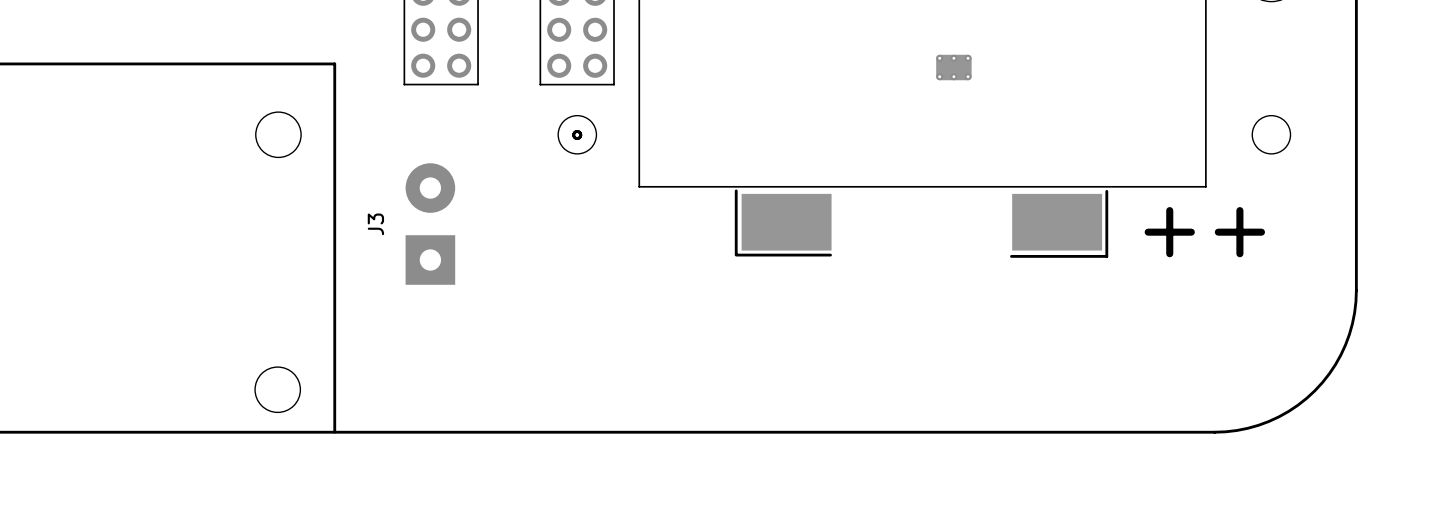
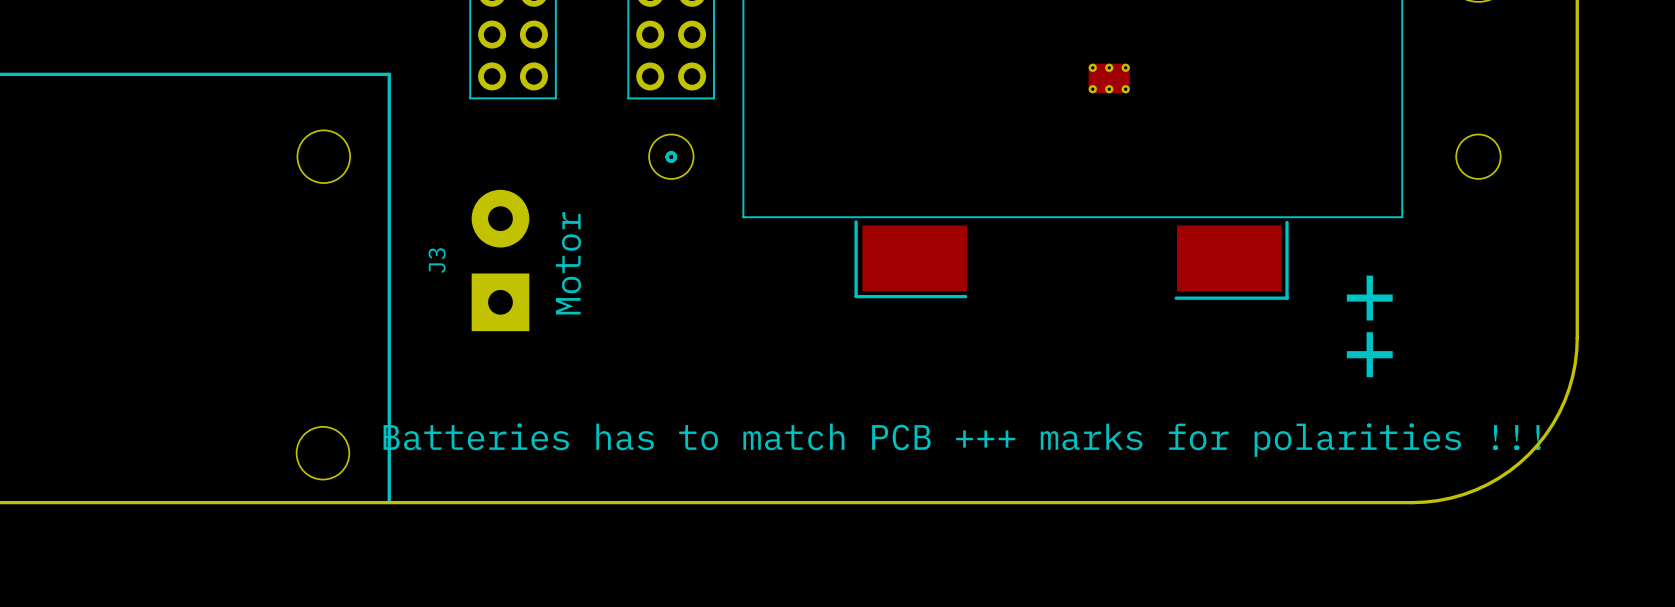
text: none -> Motor (568, 263)
part text rotation: 0° (1204, 232) -> 90° counterclockwise (1369, 326)
text: none -> Batteries has to match PCB +++ marks for polarities !!! (962, 440)

